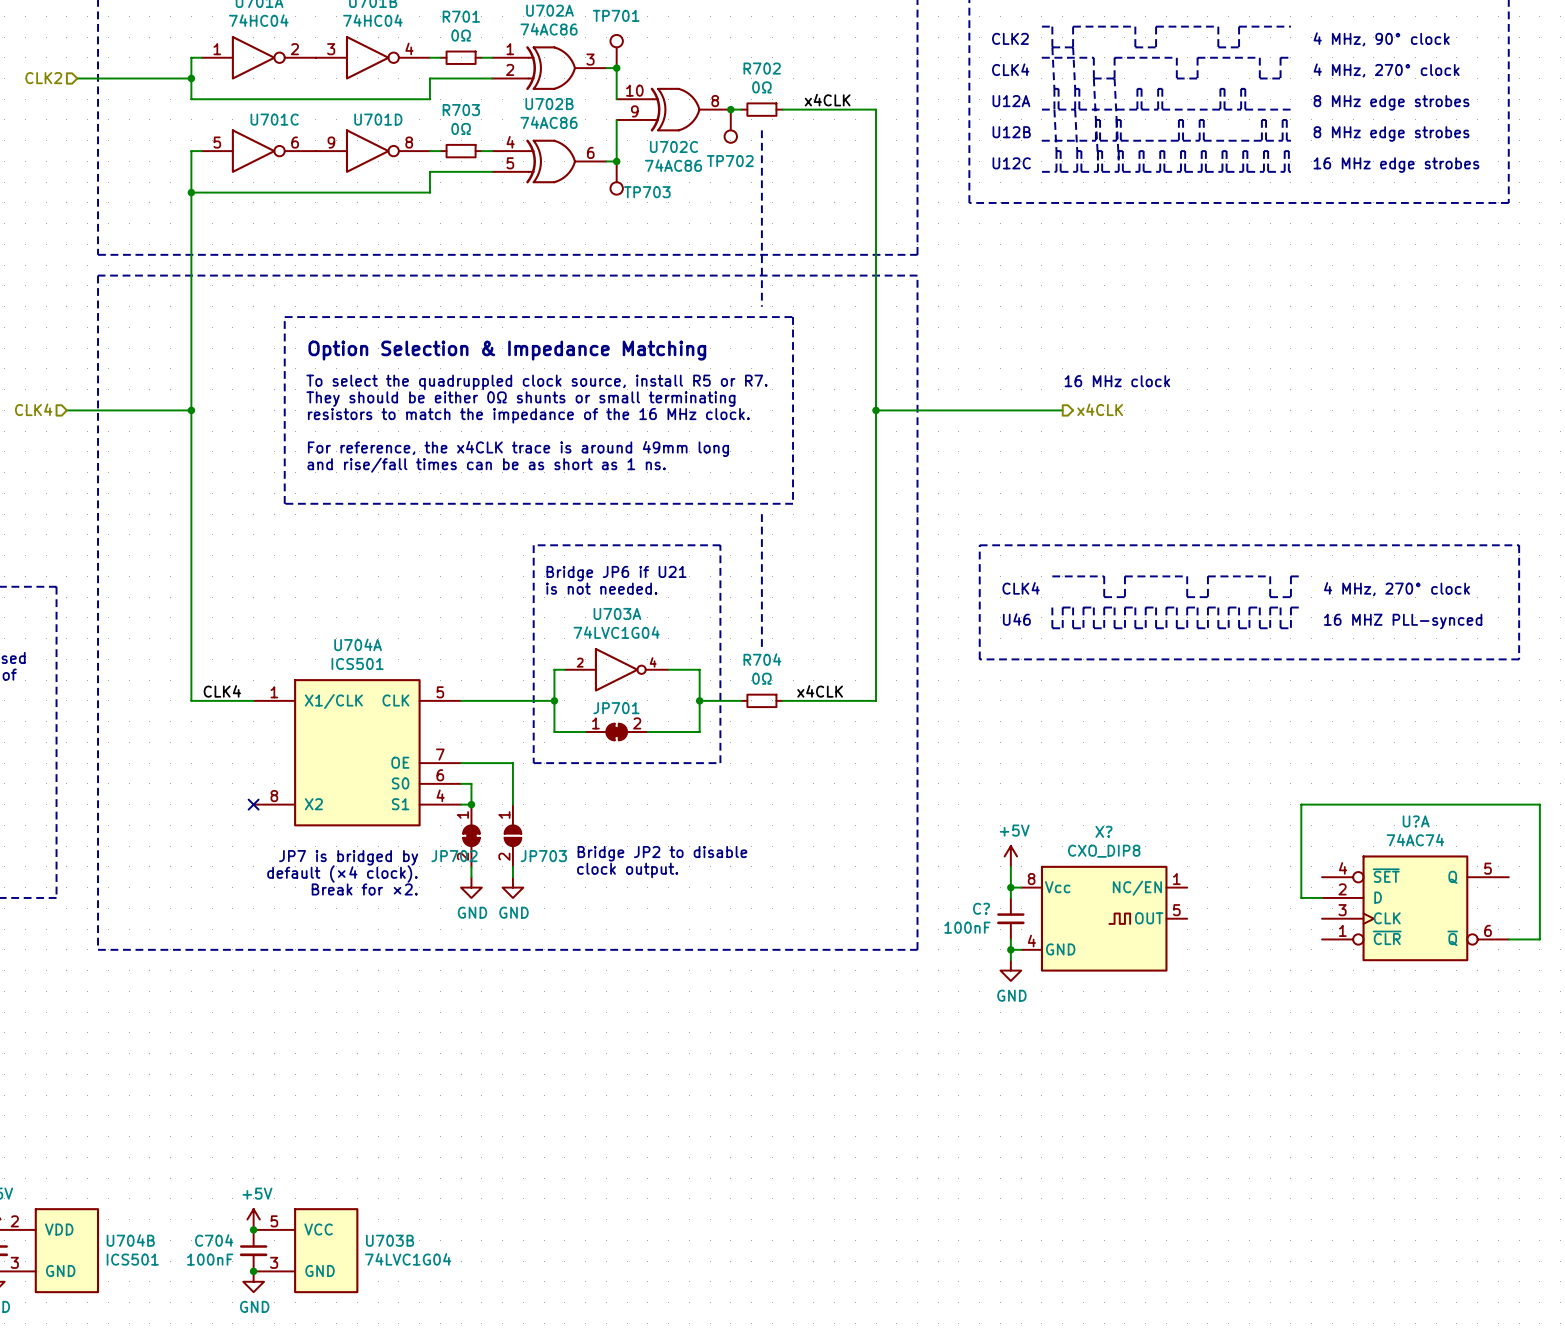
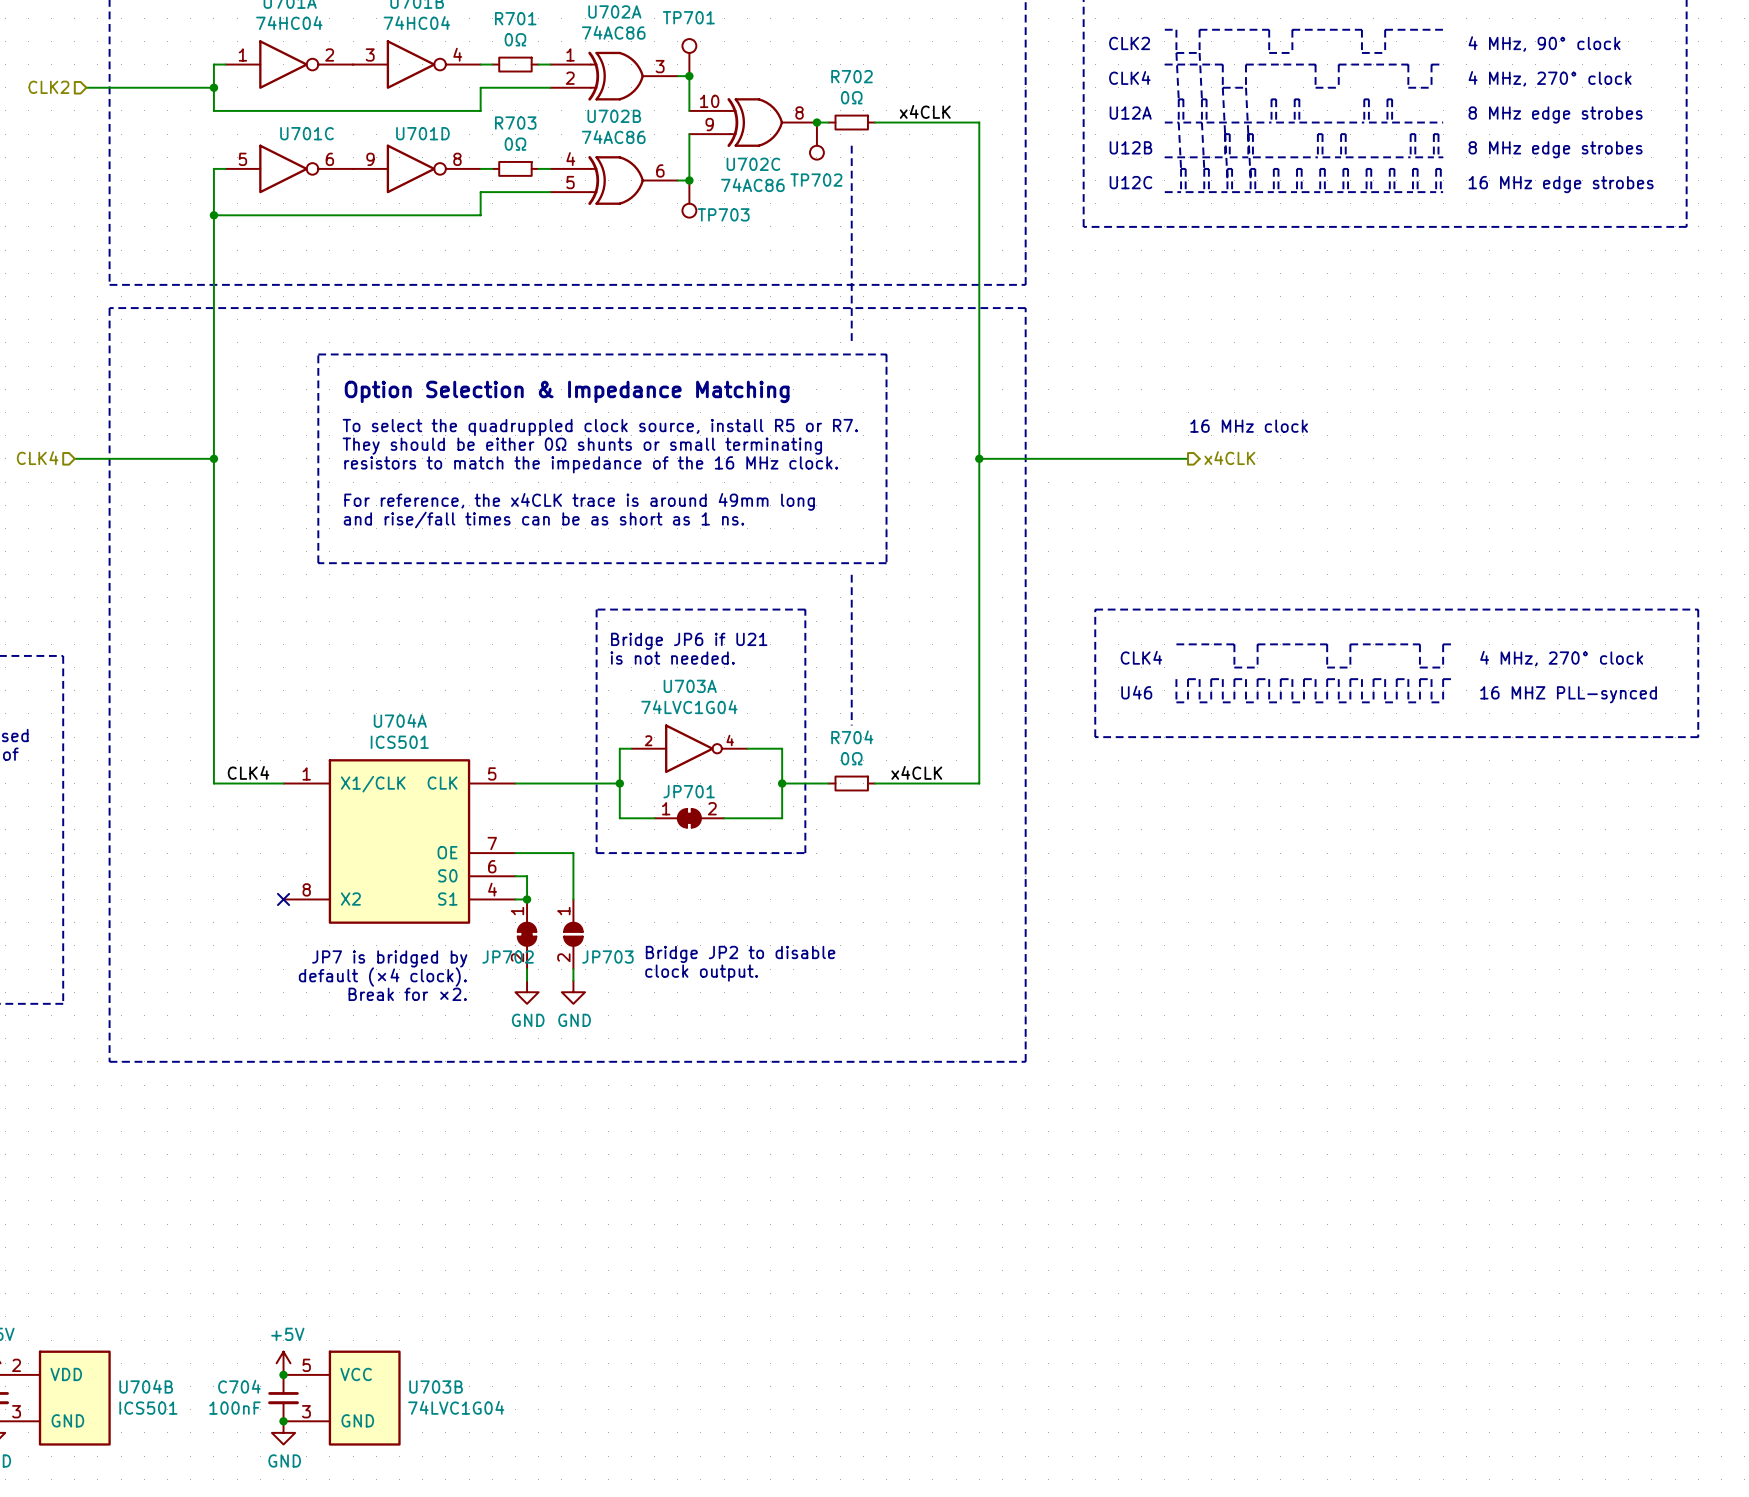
power symbol: +5V (1010, 856) -> none
wire: (1010, 866) (1010, 897) -> none
wire: (1010, 887) (1021, 887) -> none
junction: (1010, 887) -> none
wire: (1322, 897) (1301, 897) (1301, 804) (1539, 804) (1539, 939) (1508, 939) -> none
U?A: 74AC74 (1415, 908) -> none
C?: 100nF (1010, 918) -> none
X?: CXO_DIP8 (1104, 918) -> none
wire: (1010, 939) (1010, 960) -> none
wire: (1010, 949) (1021, 949) -> none
junction: (1010, 949) -> none
power symbol: GND (1010, 970) -> none

